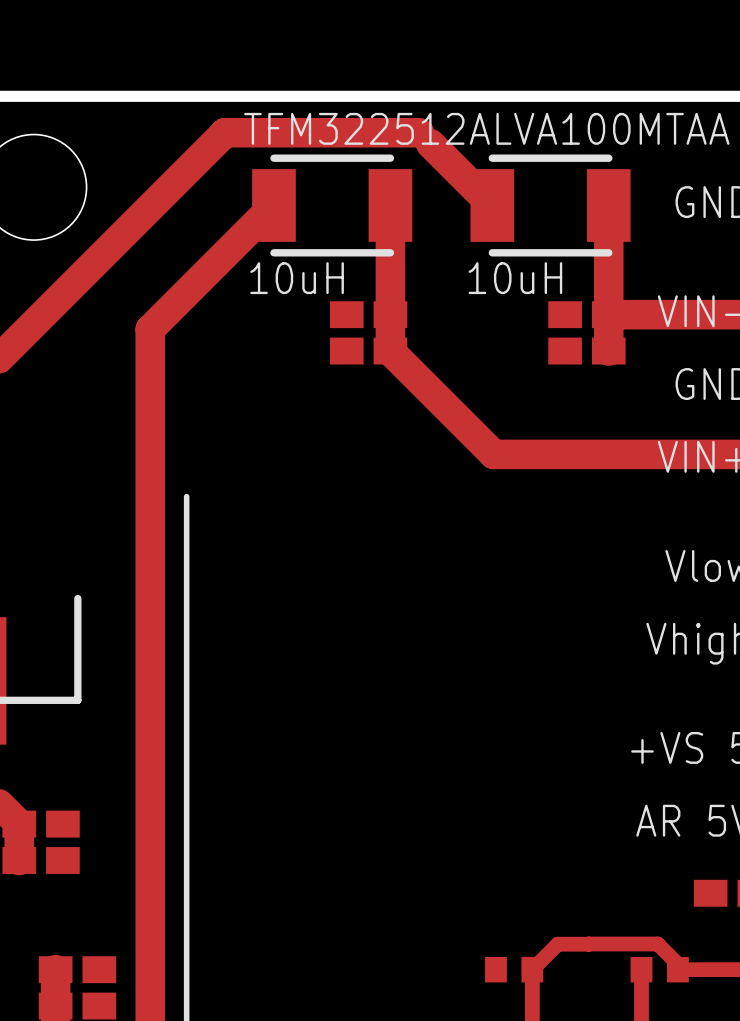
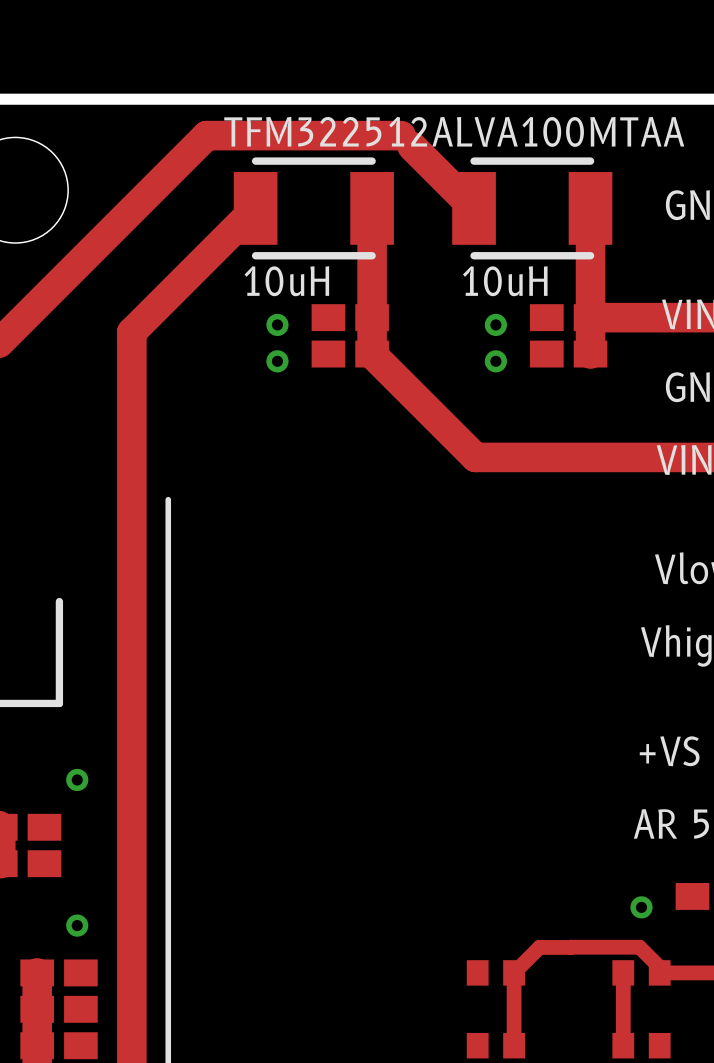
via: none -> (277, 324)
via: none -> (495, 324)
via: none -> (277, 361)
via: none -> (495, 361)
via: none -> (77, 779)
via: none -> (641, 907)
via: none -> (77, 925)

